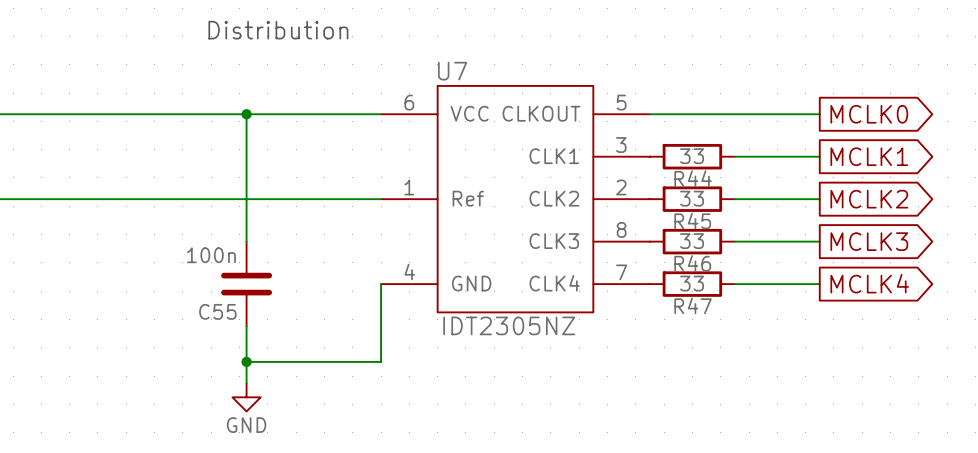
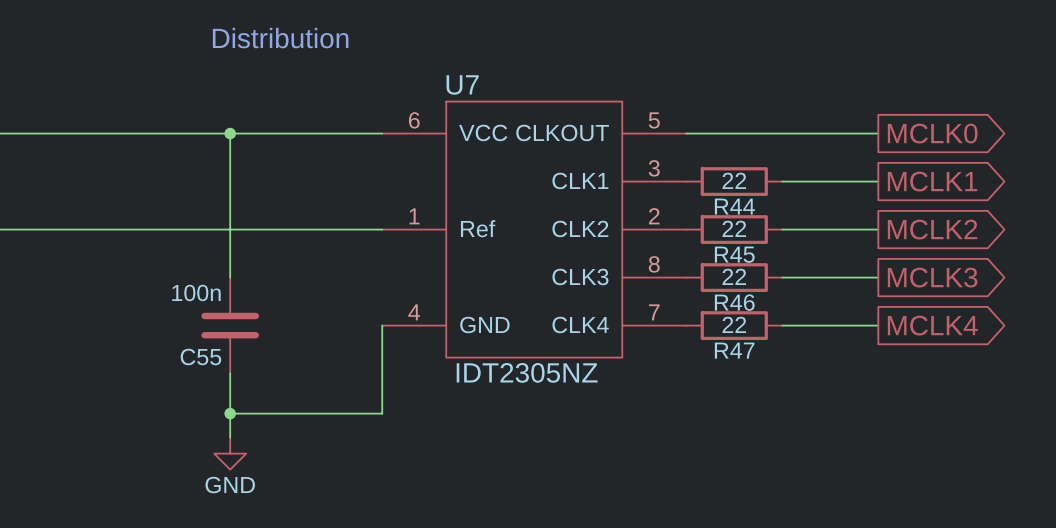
R44 value: 33 (692, 156) -> 22 (734, 180)
R45 value: 33 (692, 198) -> 22 (734, 228)
R46 value: 33 (692, 241) -> 22 (734, 276)
R47 value: 33 (692, 283) -> 22 (734, 324)

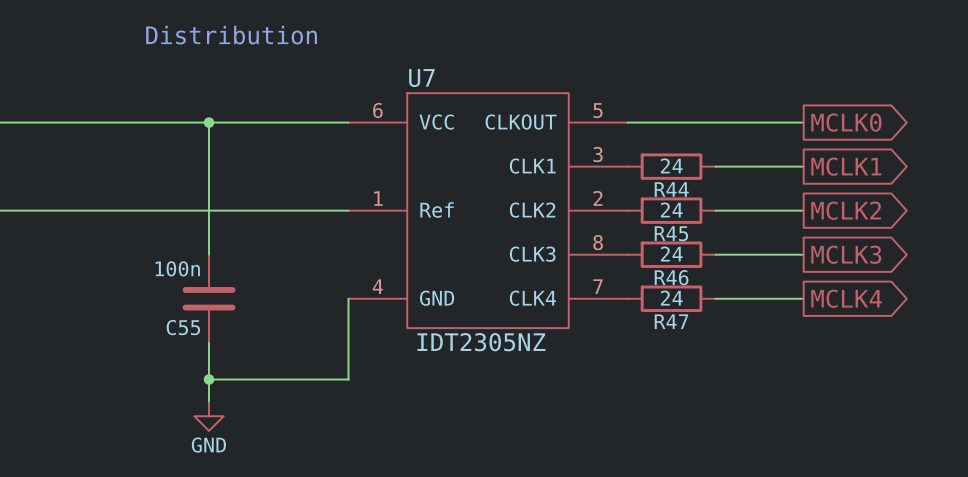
R44 value: 22 (734, 180) -> 24 (671, 165)
R45 value: 22 (734, 228) -> 24 (671, 209)
R46 value: 22 (734, 276) -> 24 (671, 254)
R47 value: 22 (734, 324) -> 24 (671, 298)

